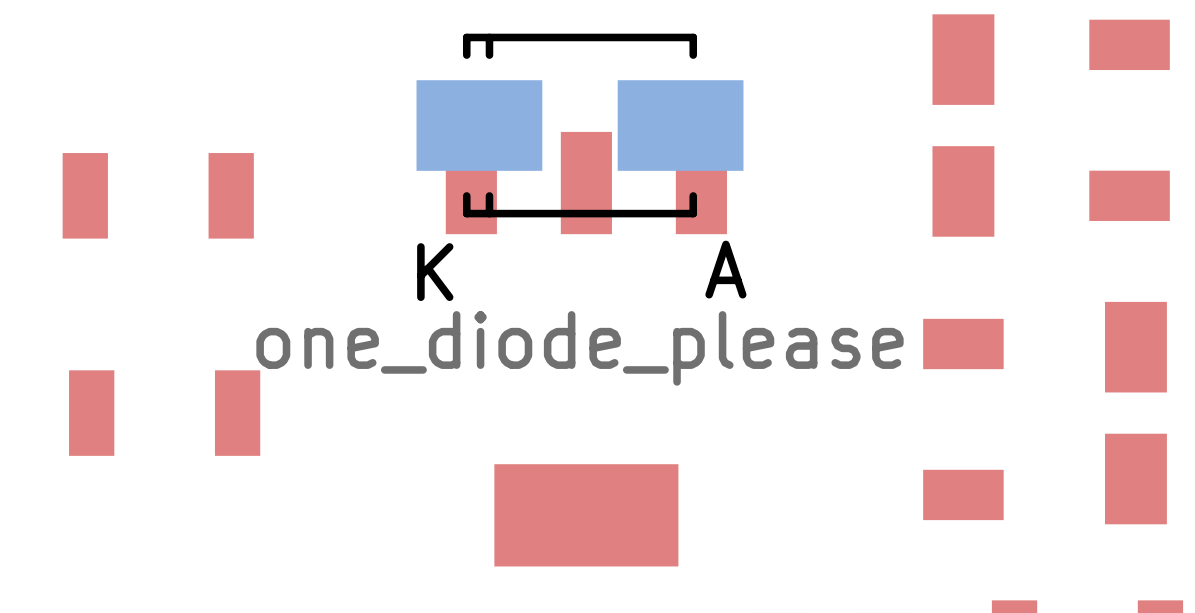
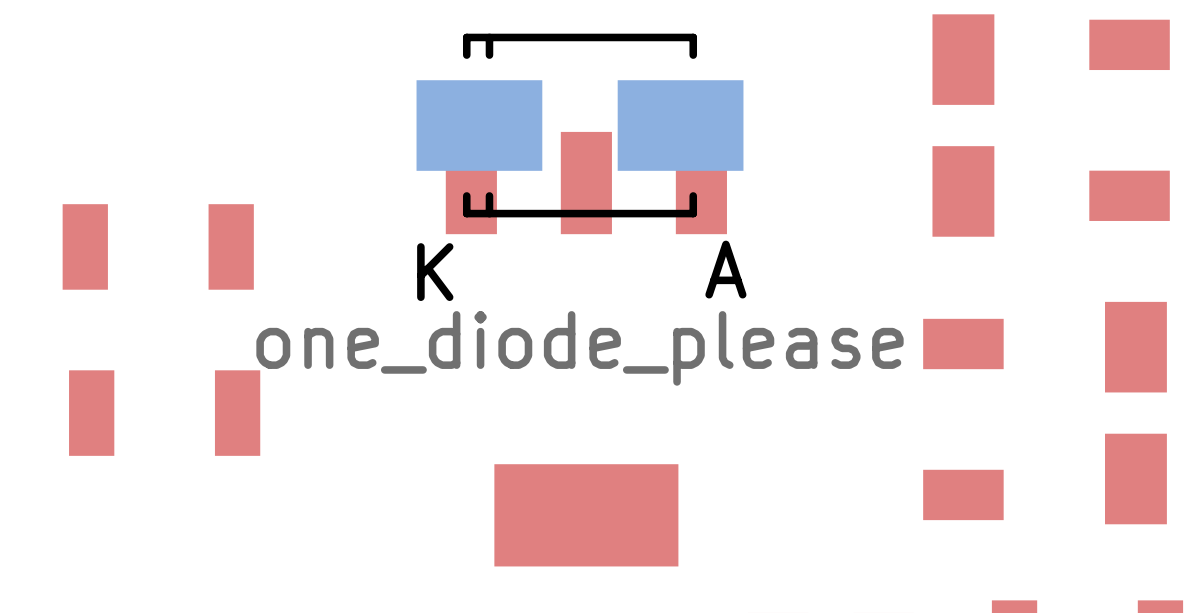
part position: (158, 195) -> (158, 246)

